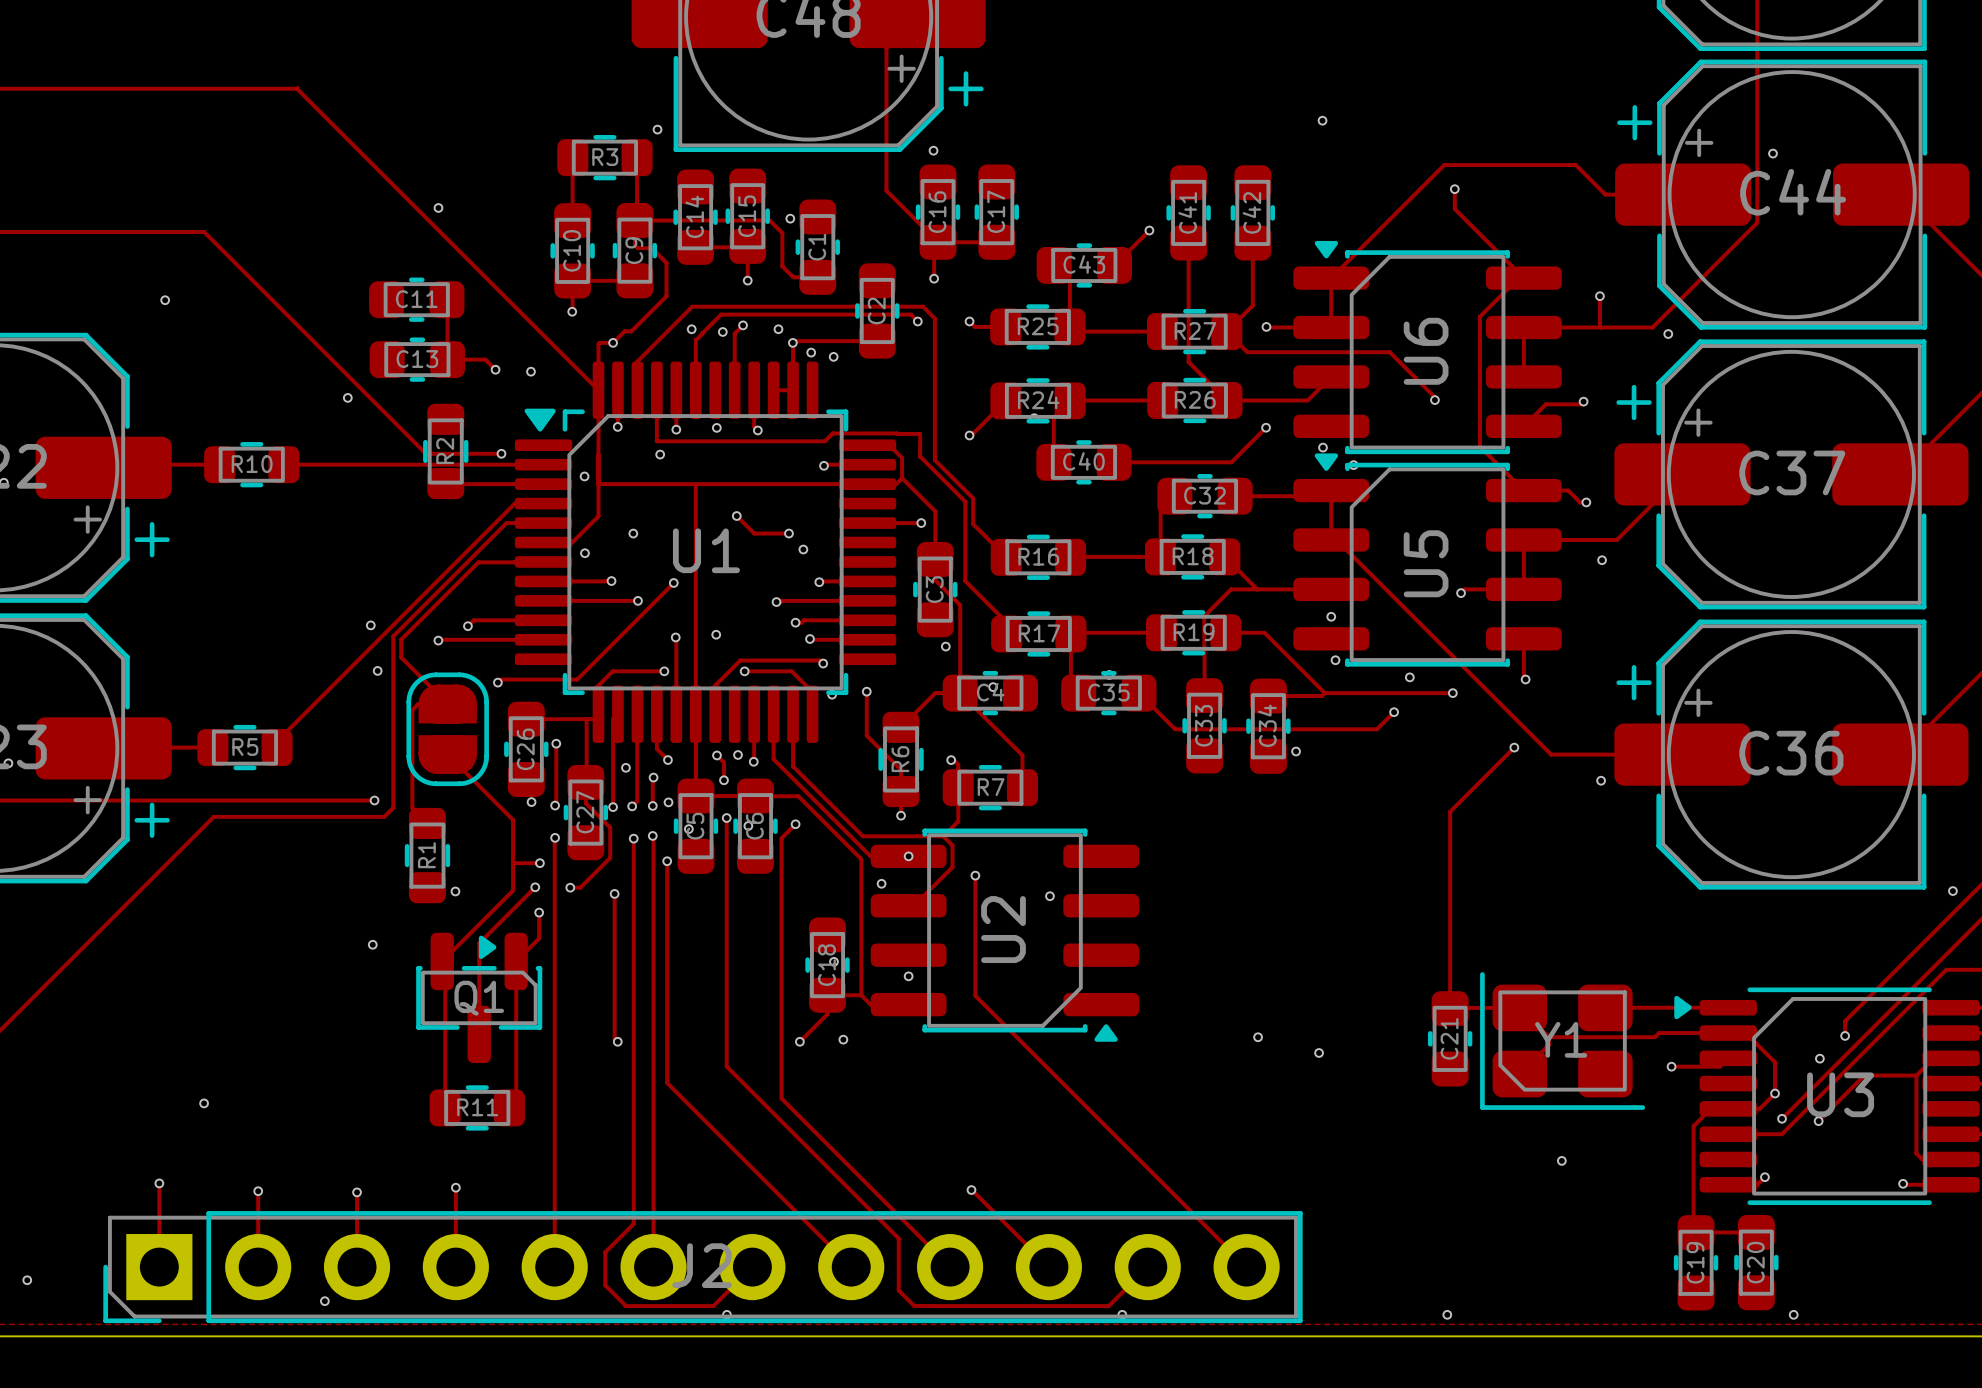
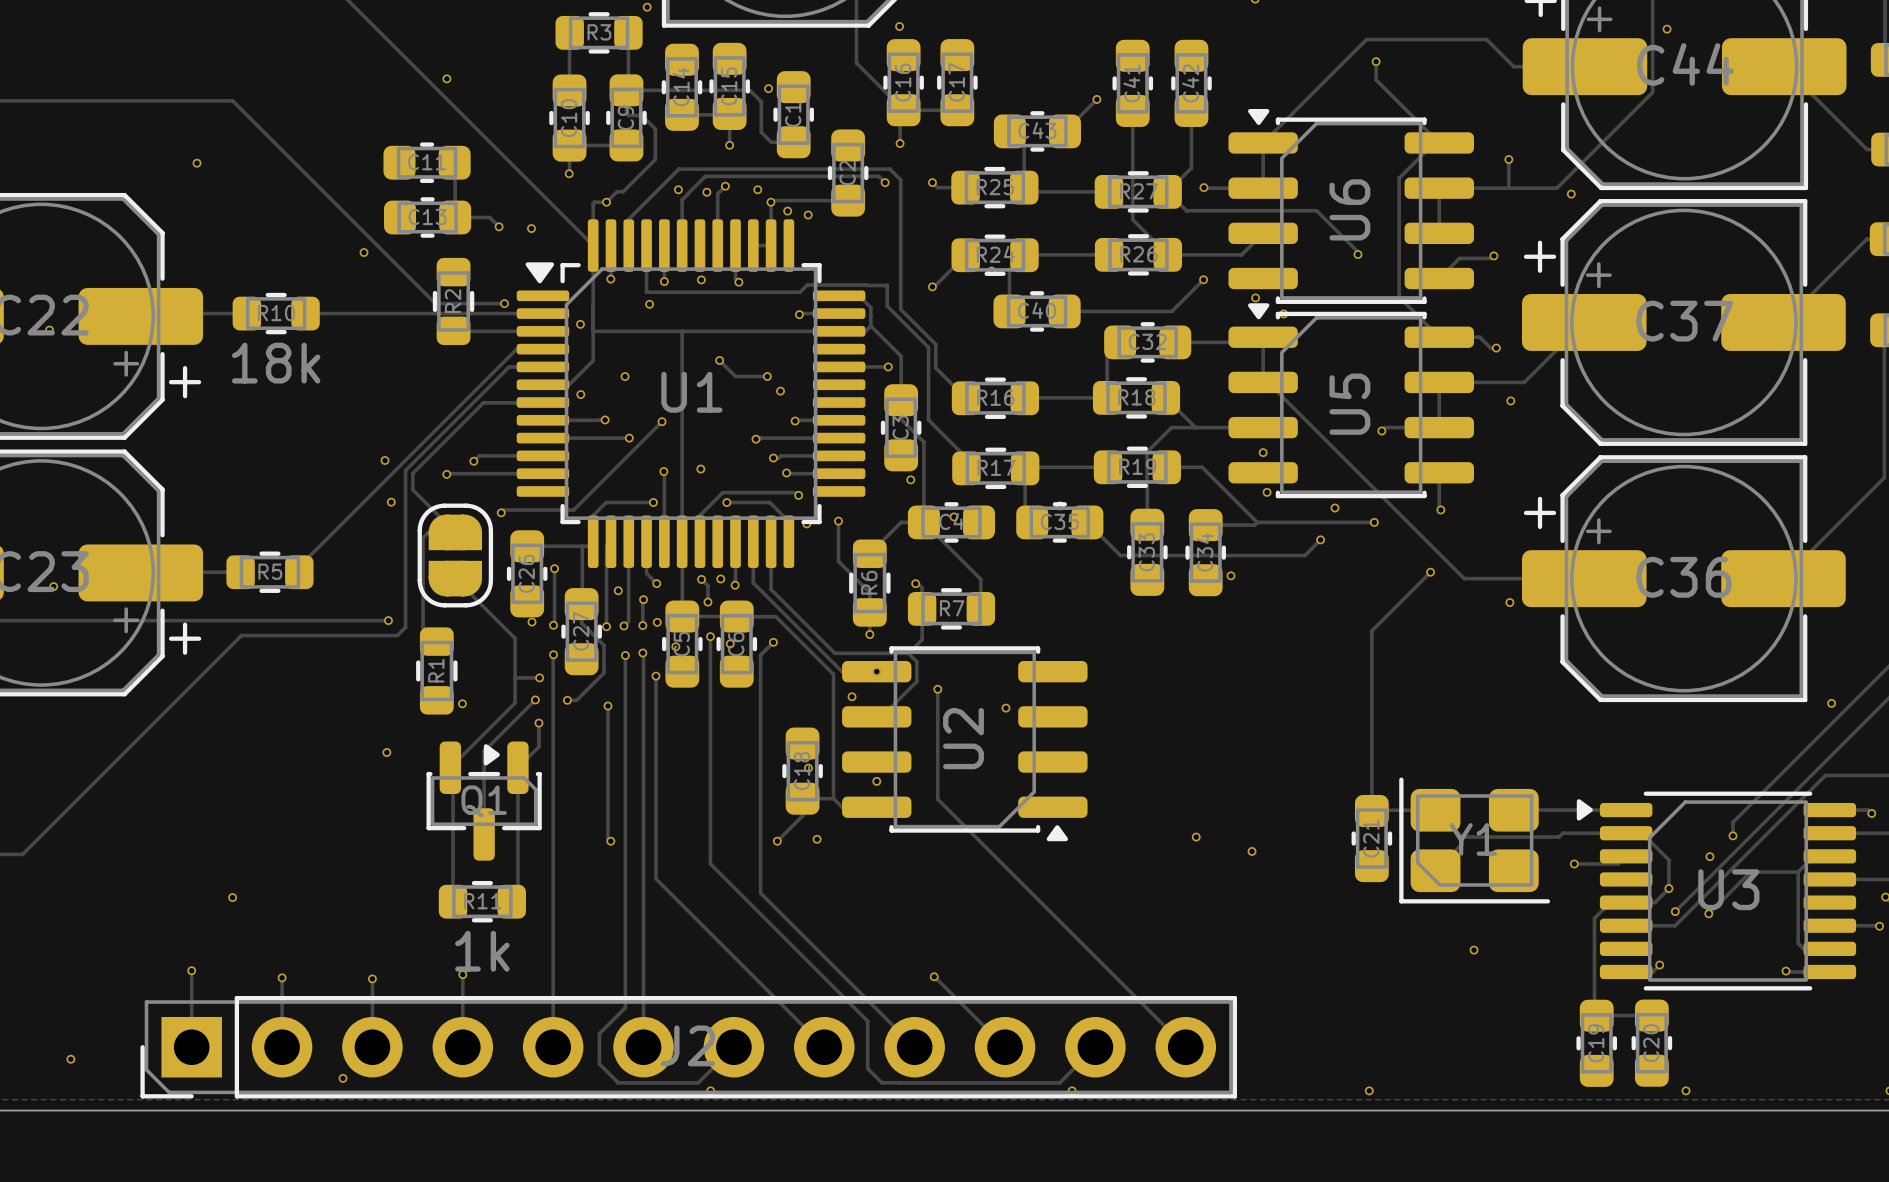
R10 value: none -> 18k (276, 363)
R11 value: none -> 1k (482, 951)

